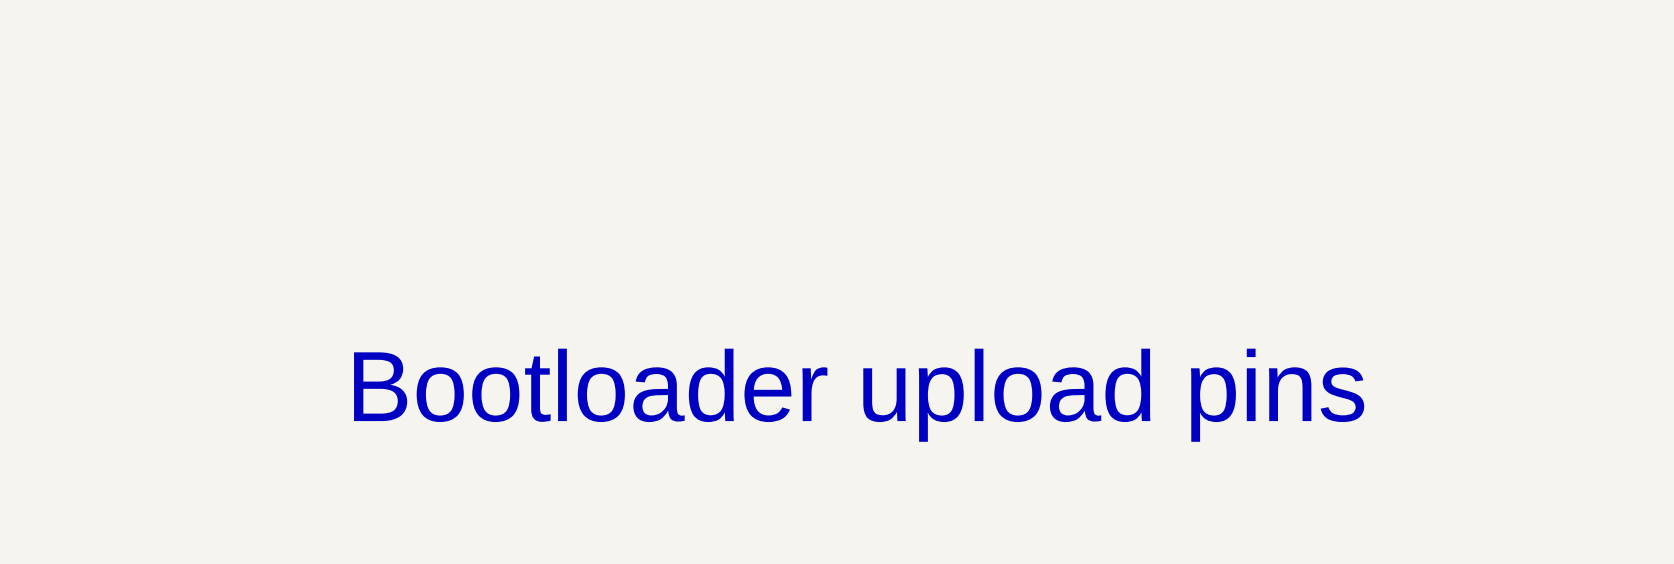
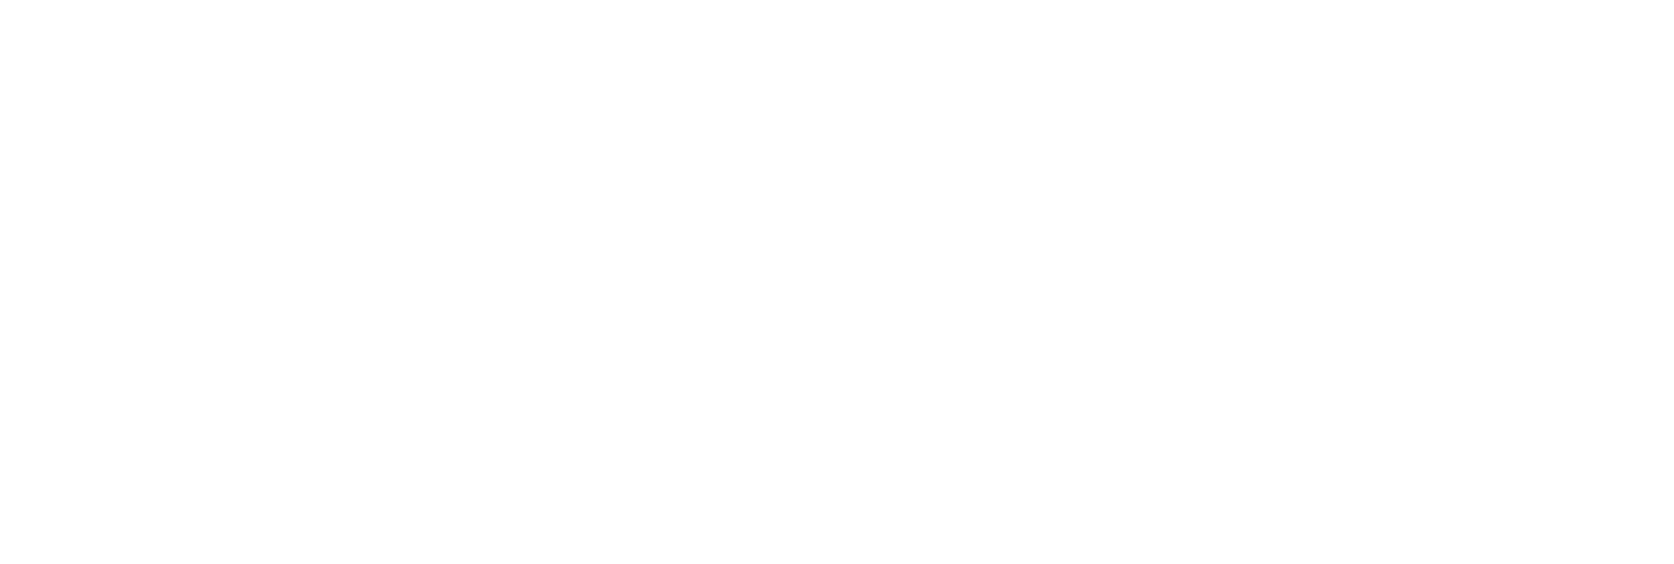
text: Bootloader upload pins (859, 395) -> none

